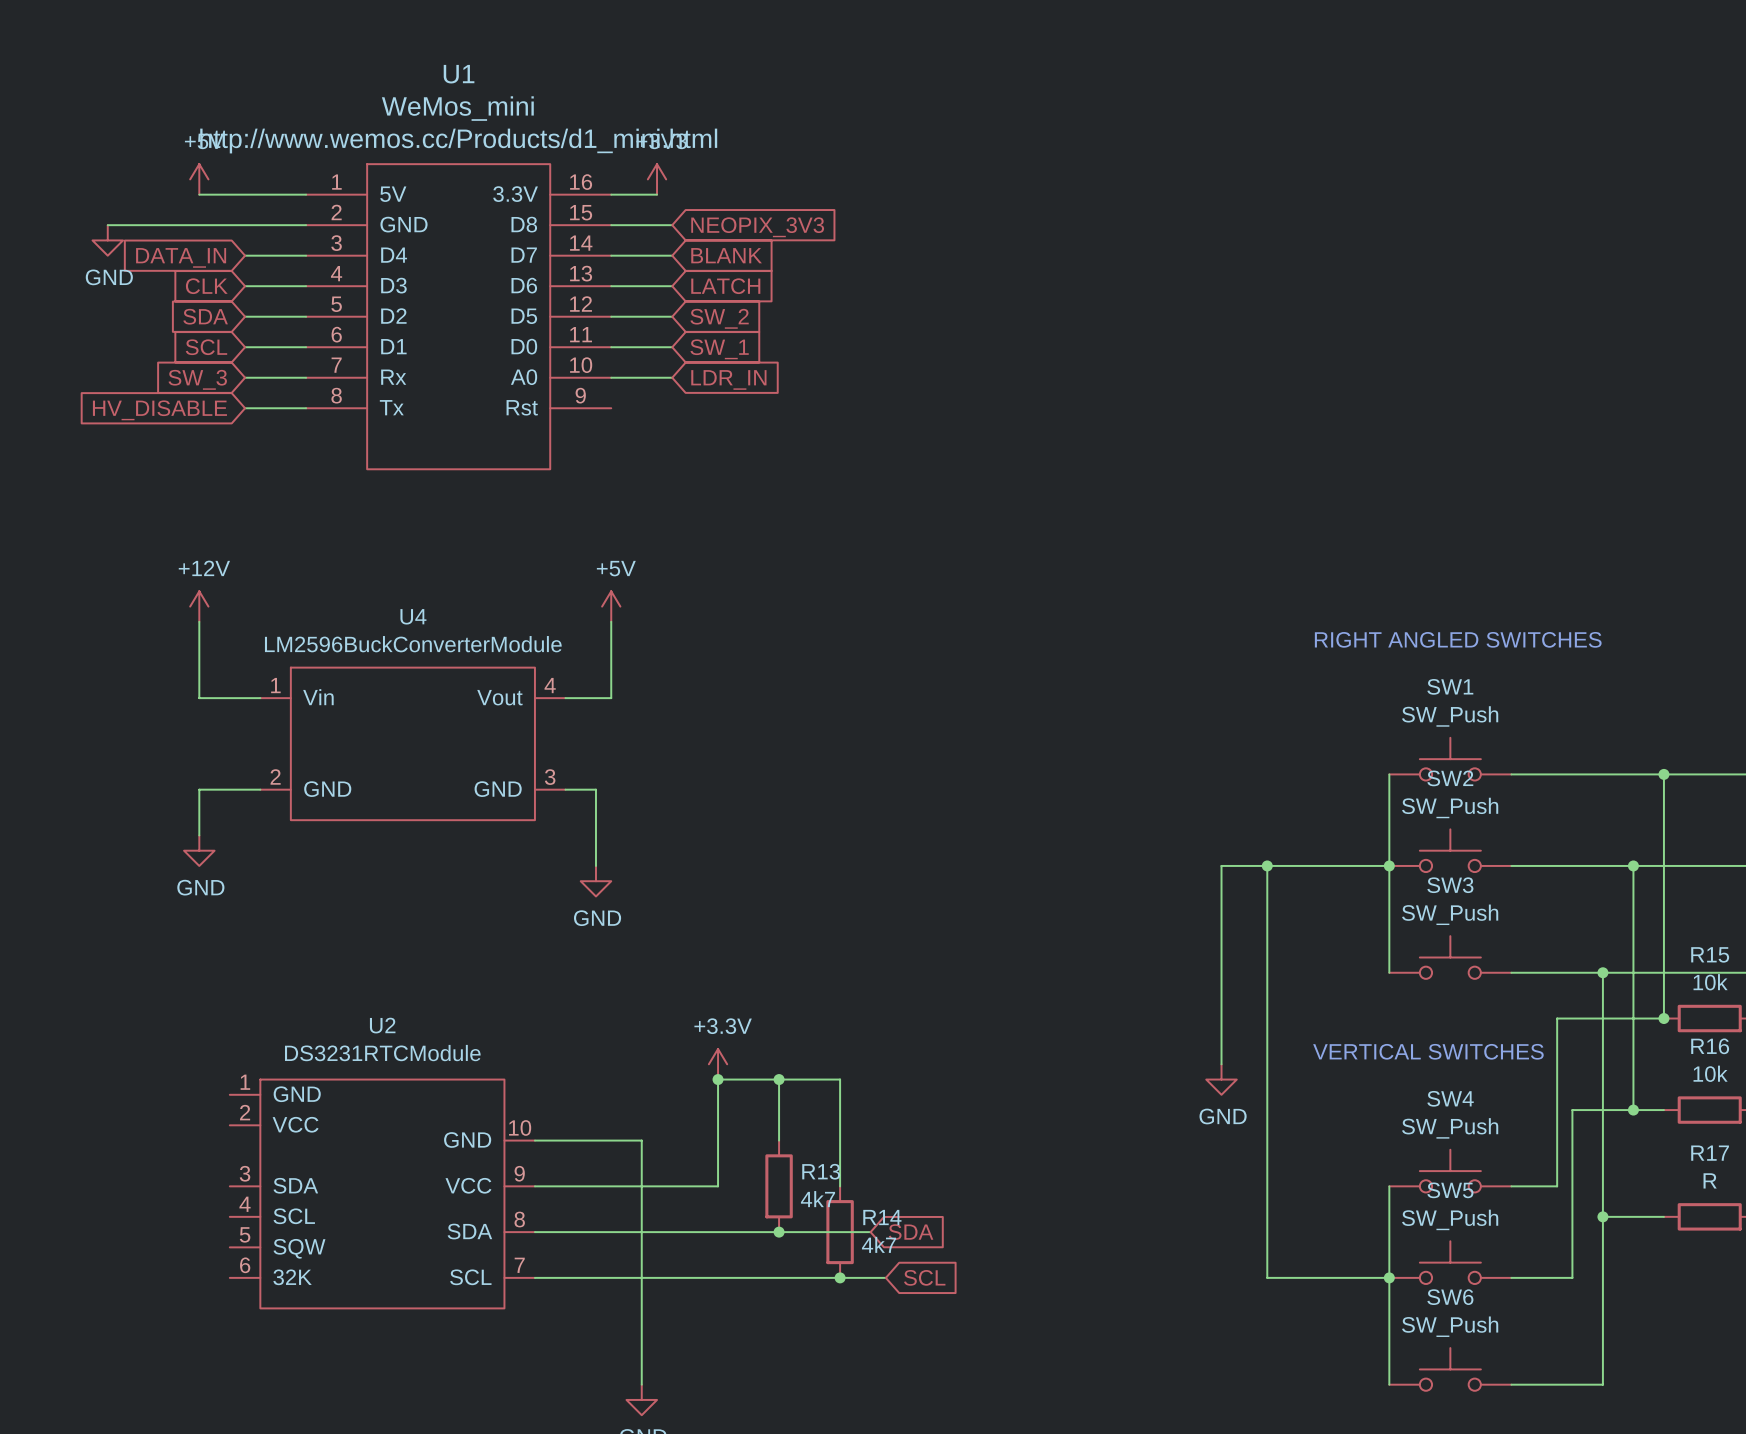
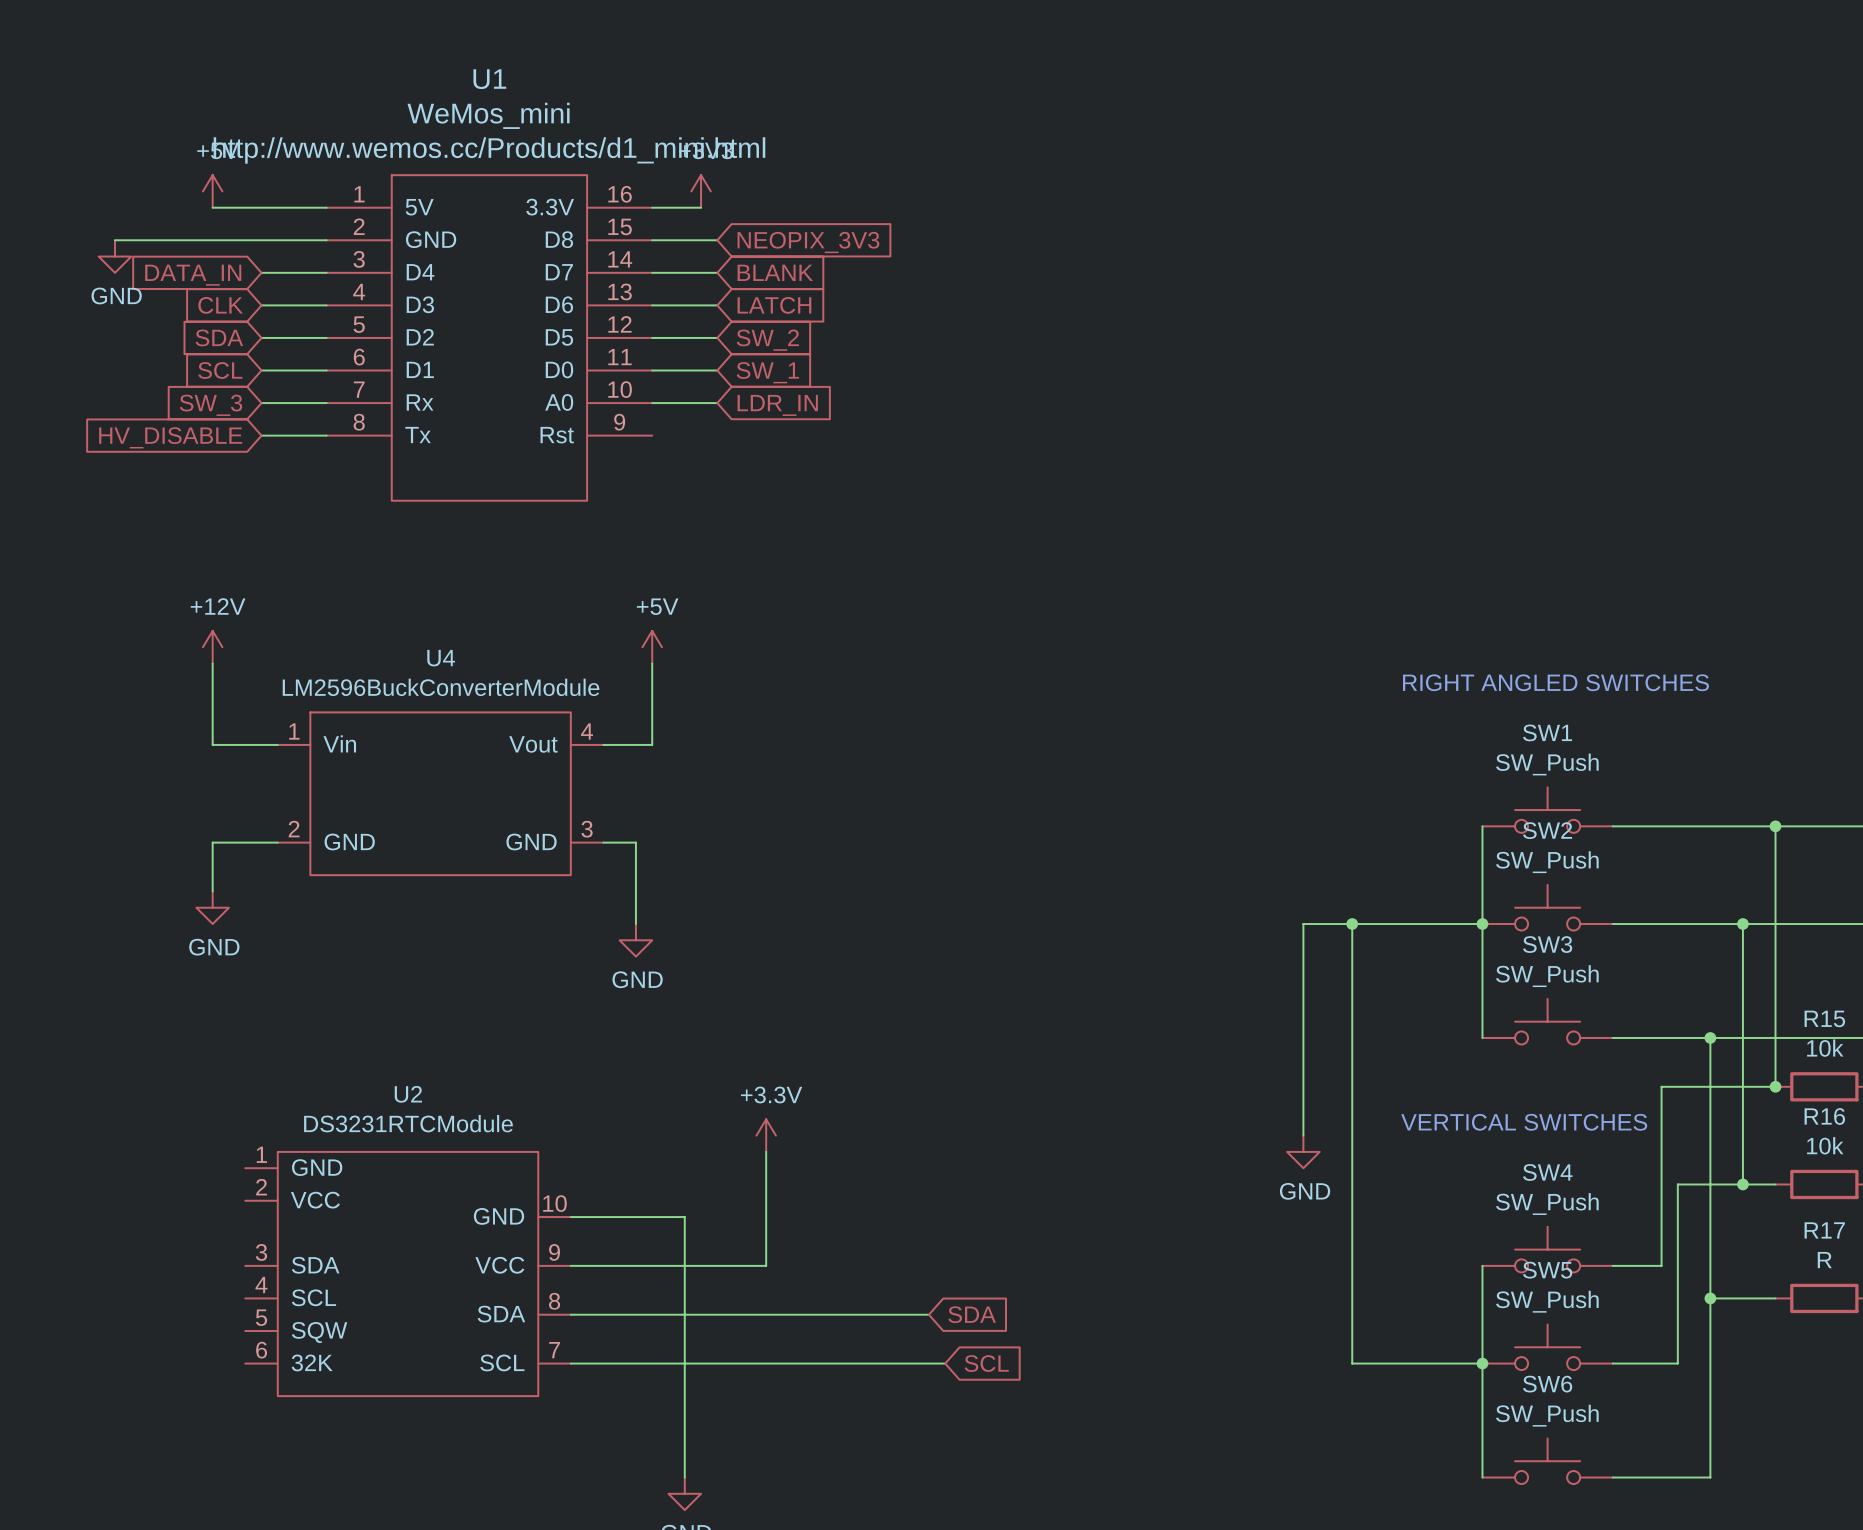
wire: (718, 1079) (840, 1079) (840, 1186) -> none
junction: (718, 1079) -> none
wire: (779, 1079) (779, 1140) -> none
junction: (779, 1079) -> none
R13: 4k7 (779, 1186) -> none
junction: (779, 1232) -> none
R14: 4k7 (840, 1232) -> none
junction: (840, 1277) -> none

